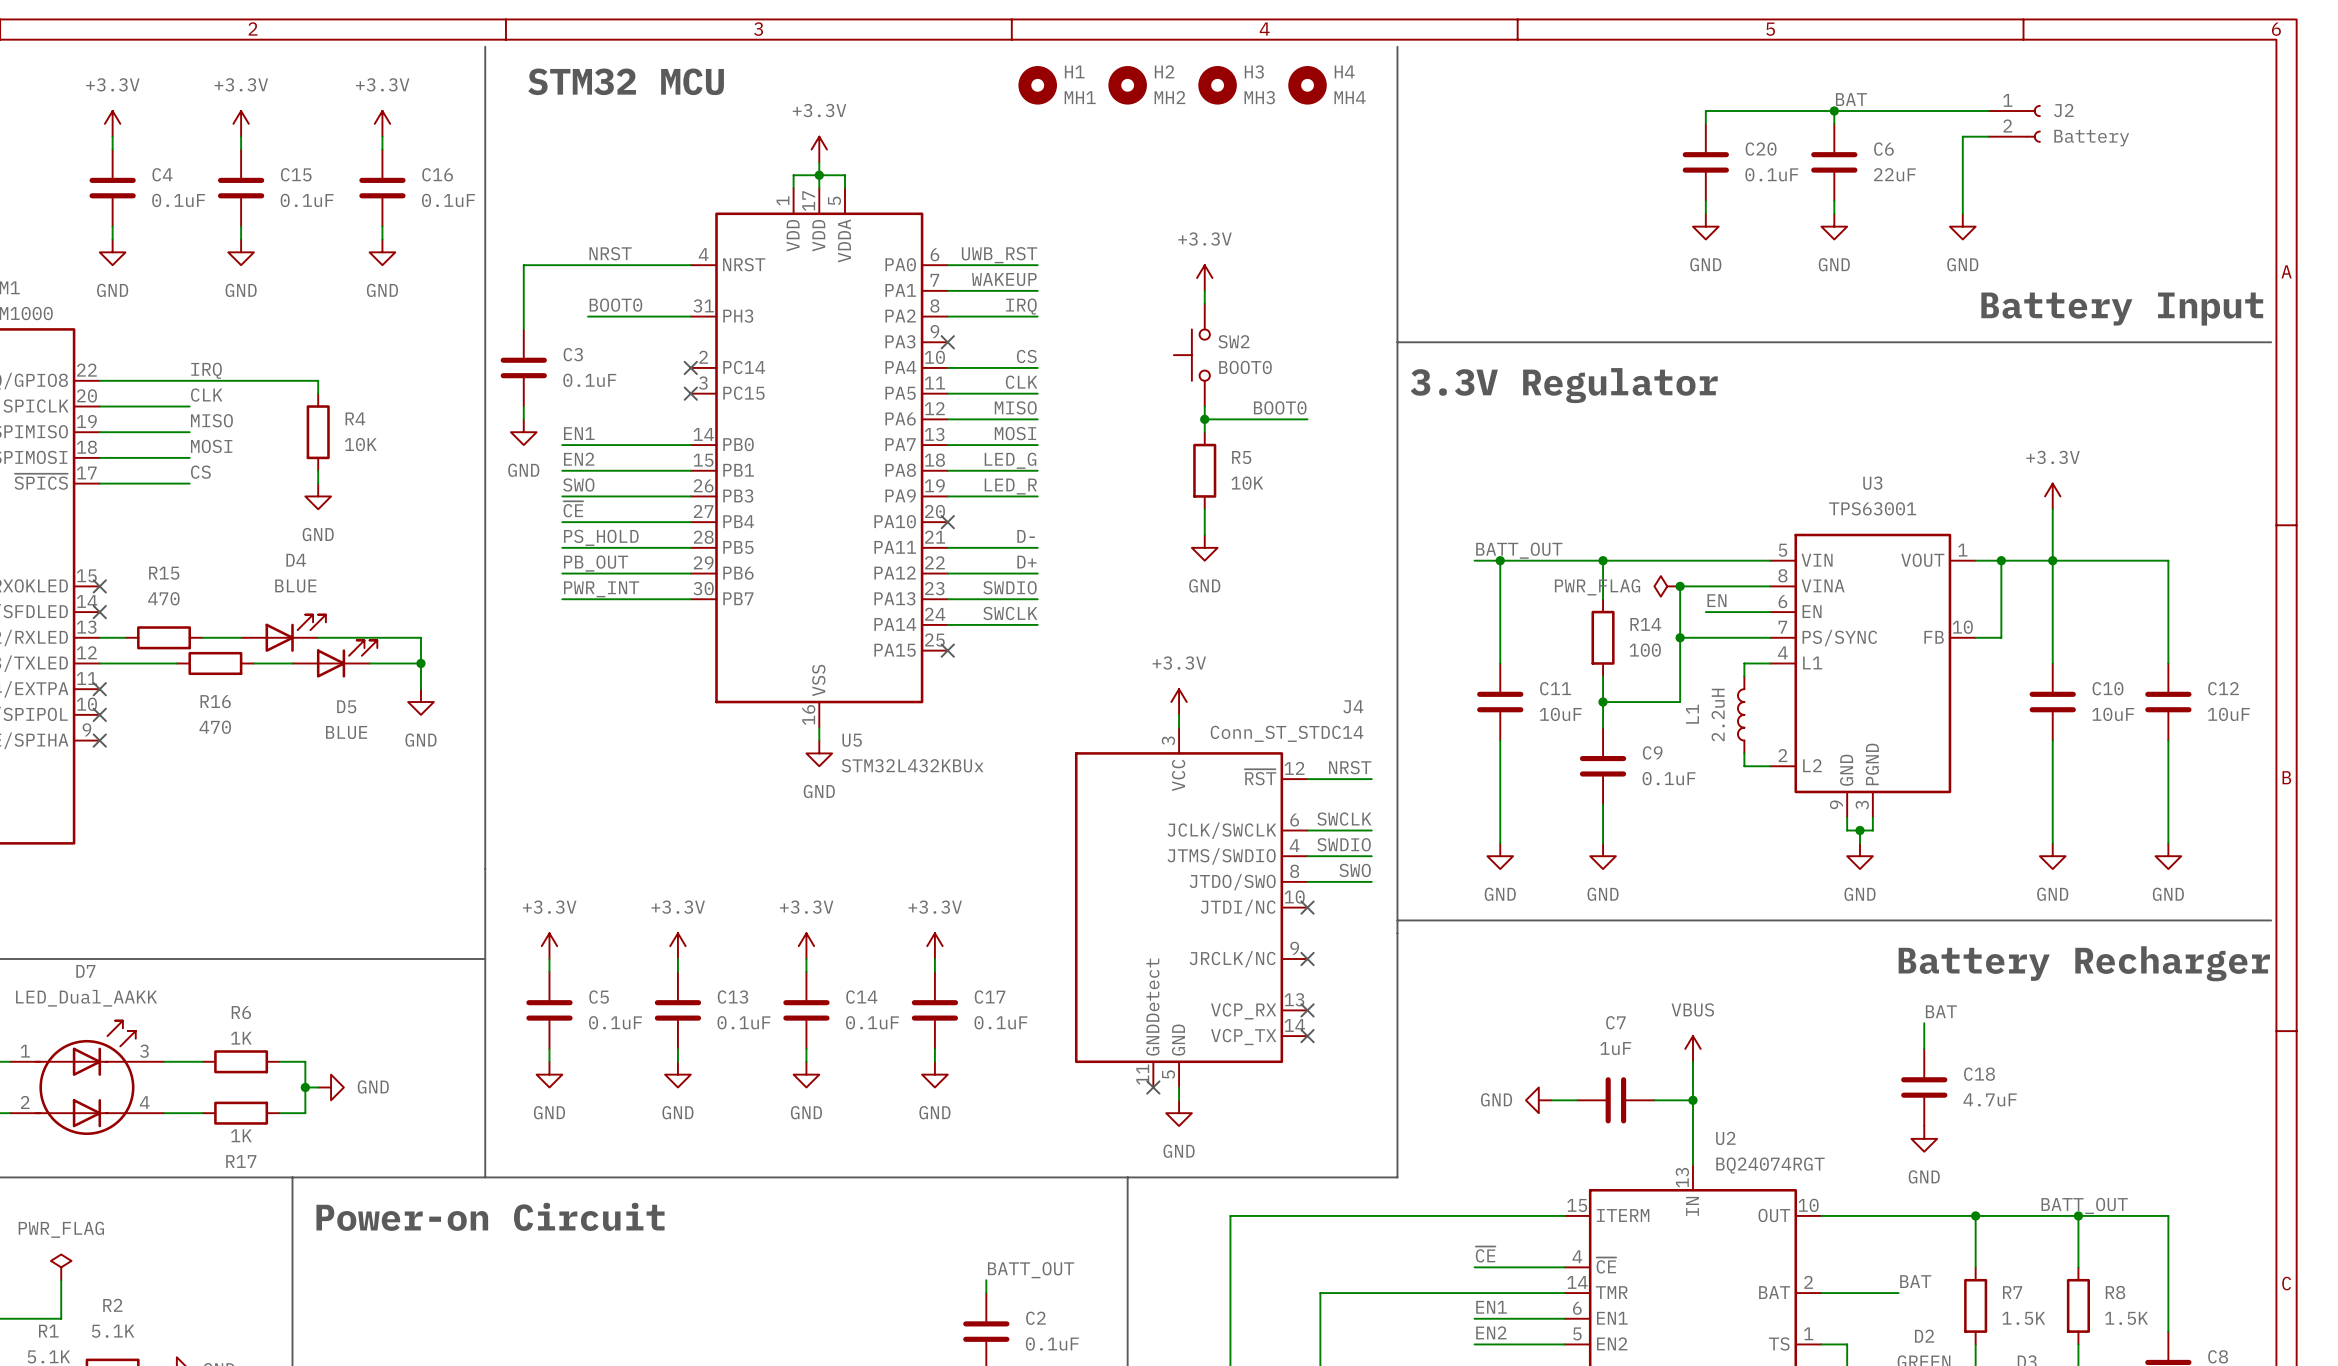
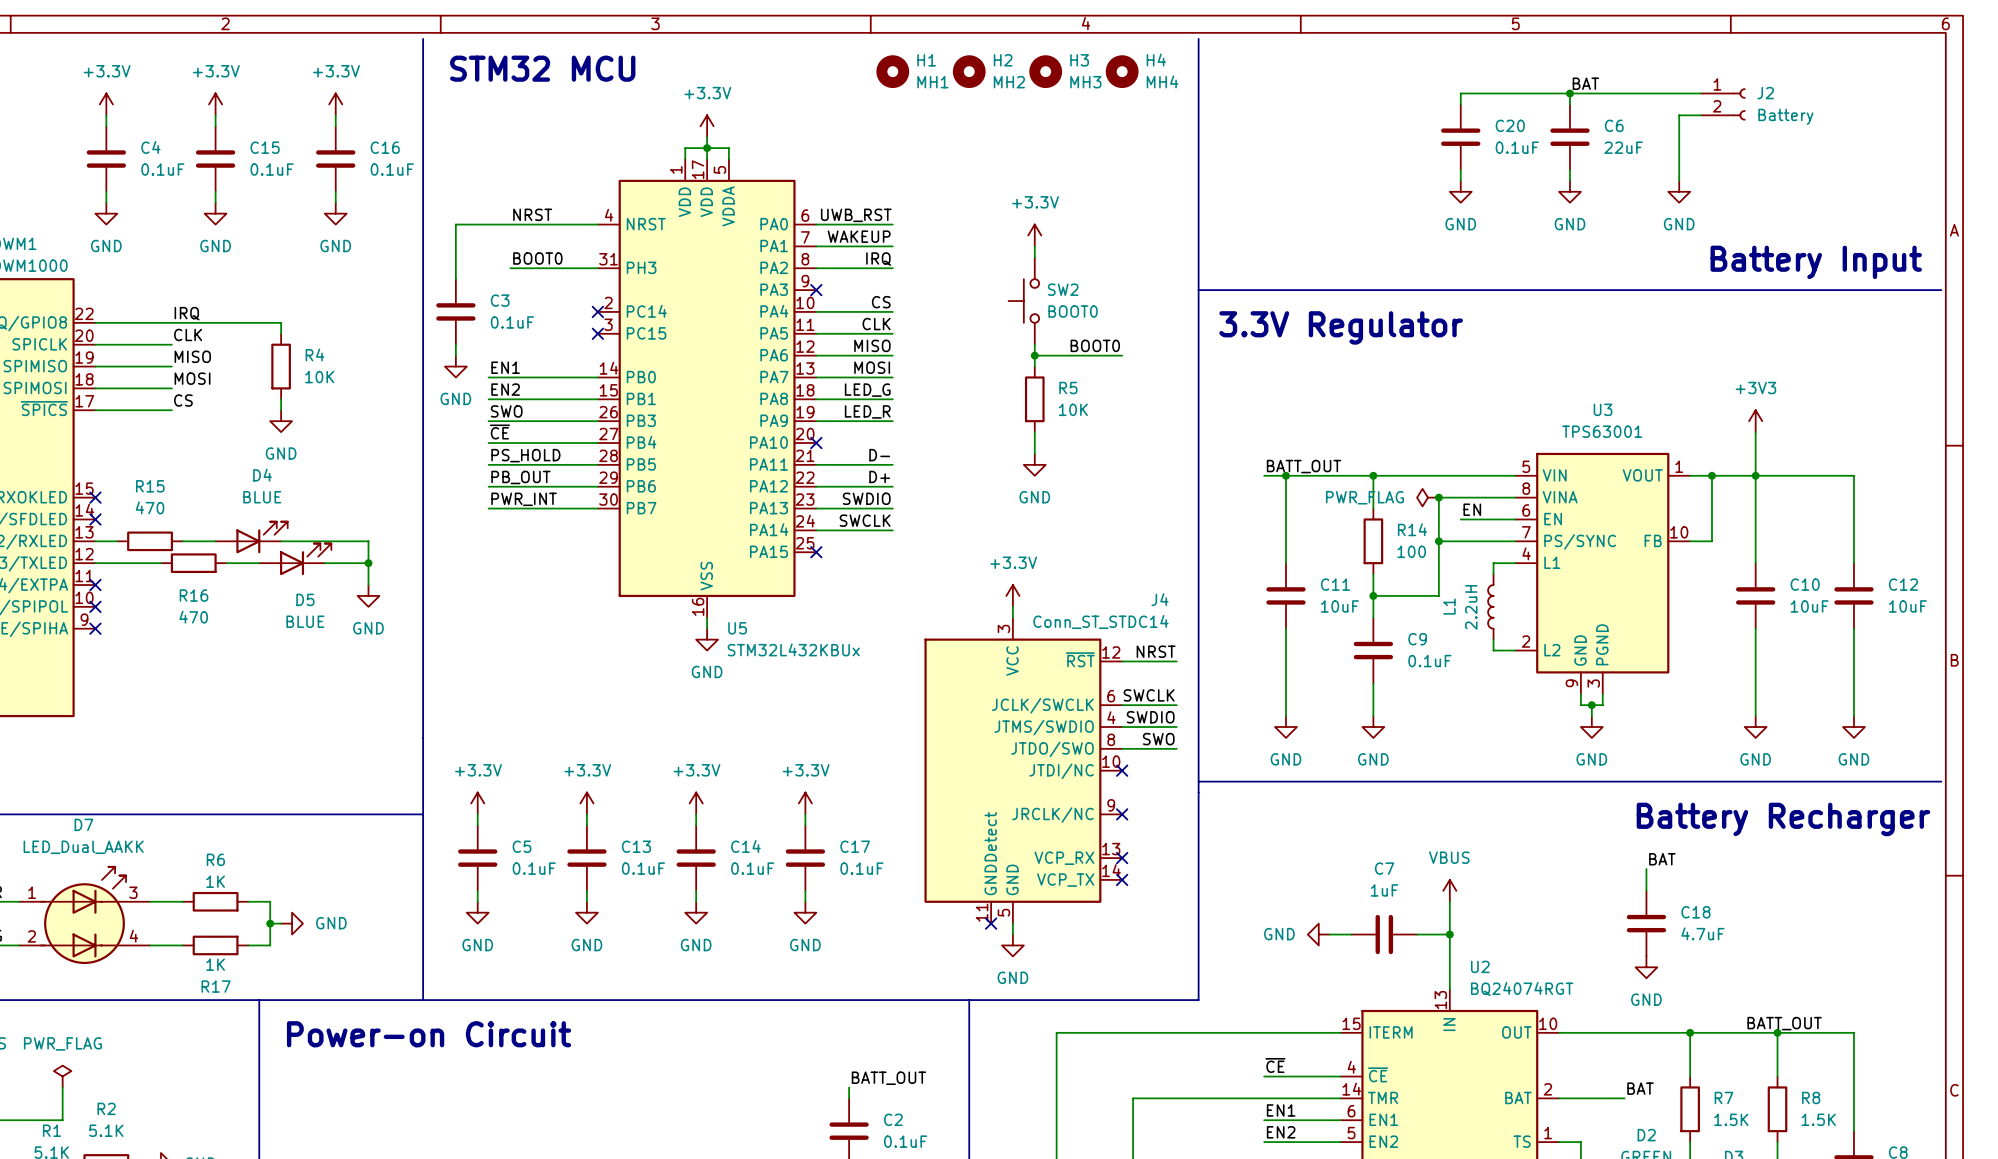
power symbol: +3.3V (2052, 496) -> +3V3 (1755, 421)

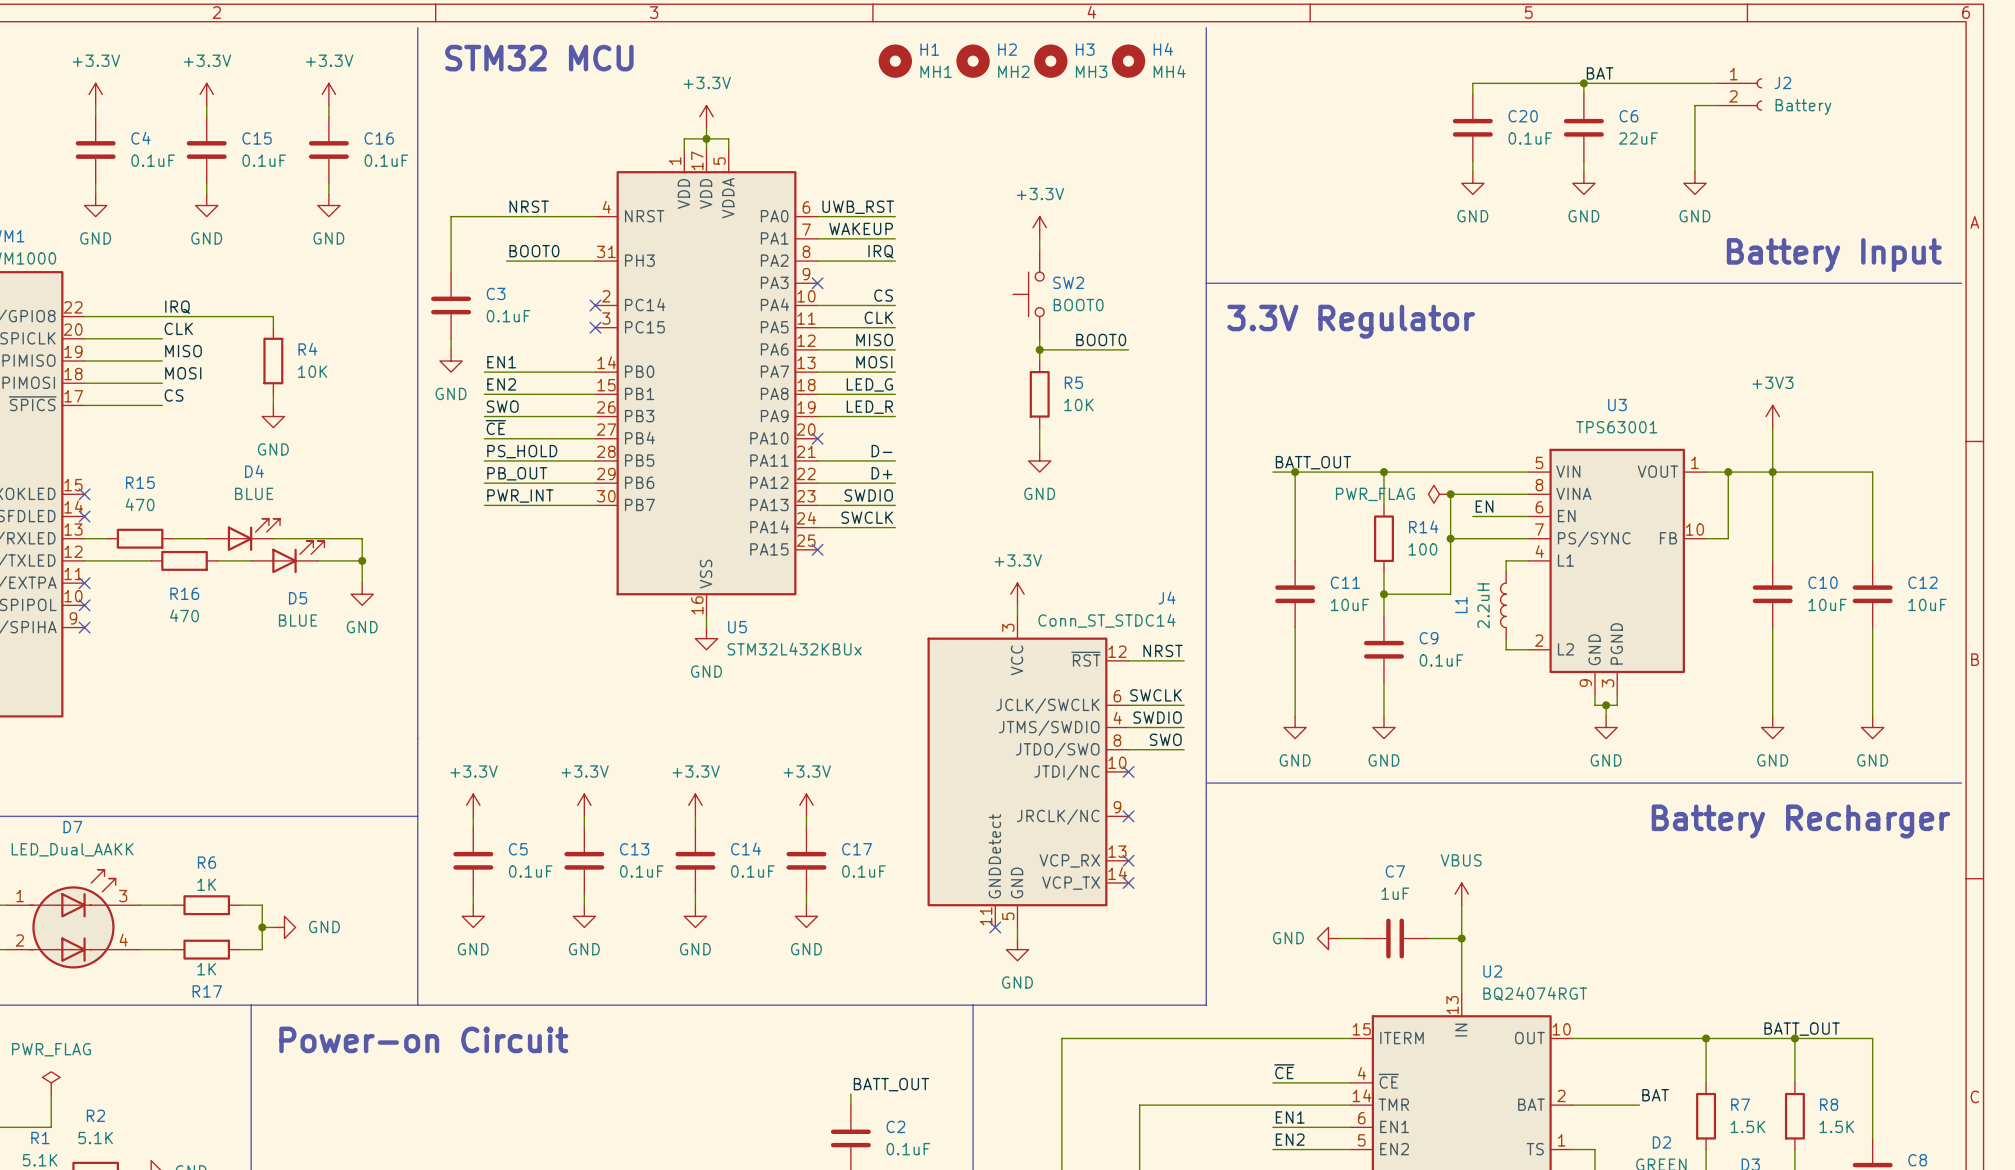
label: BAT (1662, 859) -> none
wire: (1646, 869) (1646, 890) -> none
C18: 4.7uF (1646, 923) -> none
power symbol: GND (1646, 967) -> none

